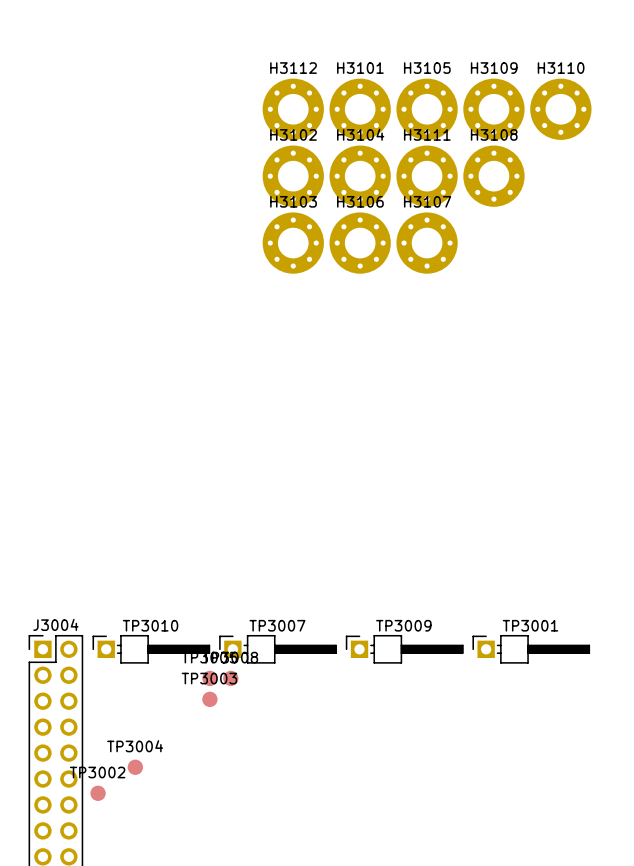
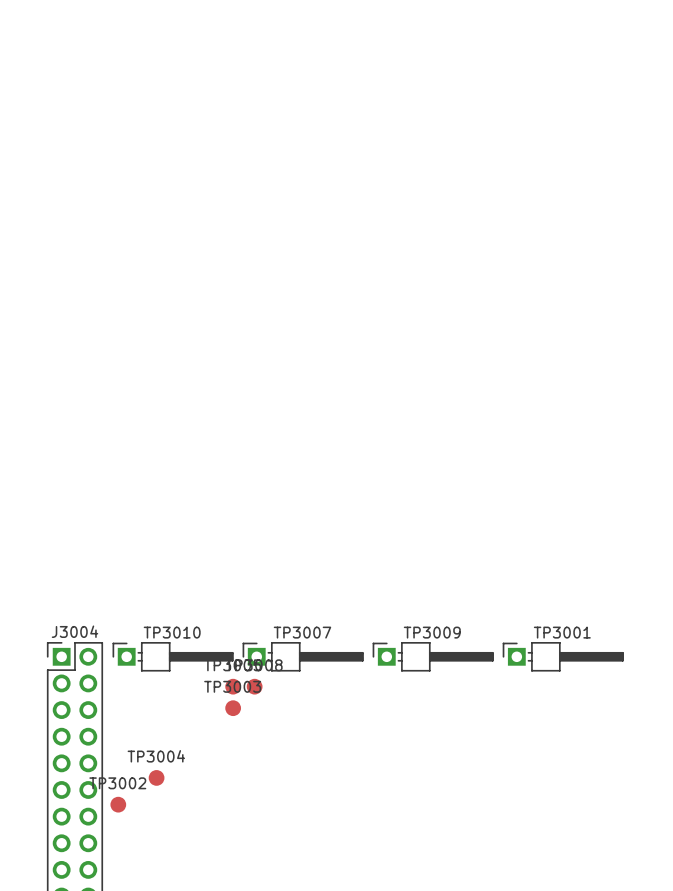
H3112: (293, 109) -> none
H3101: (360, 109) -> none
H3105: (427, 109) -> none
H3109: (493, 109) -> none
H3110: (560, 109) -> none
H3102: (293, 176) -> none
H3104: (360, 176) -> none
H3111: (427, 176) -> none
H3108: (493, 176) -> none
H3103: (293, 243) -> none
H3106: (360, 243) -> none
H3107: (427, 243) -> none

